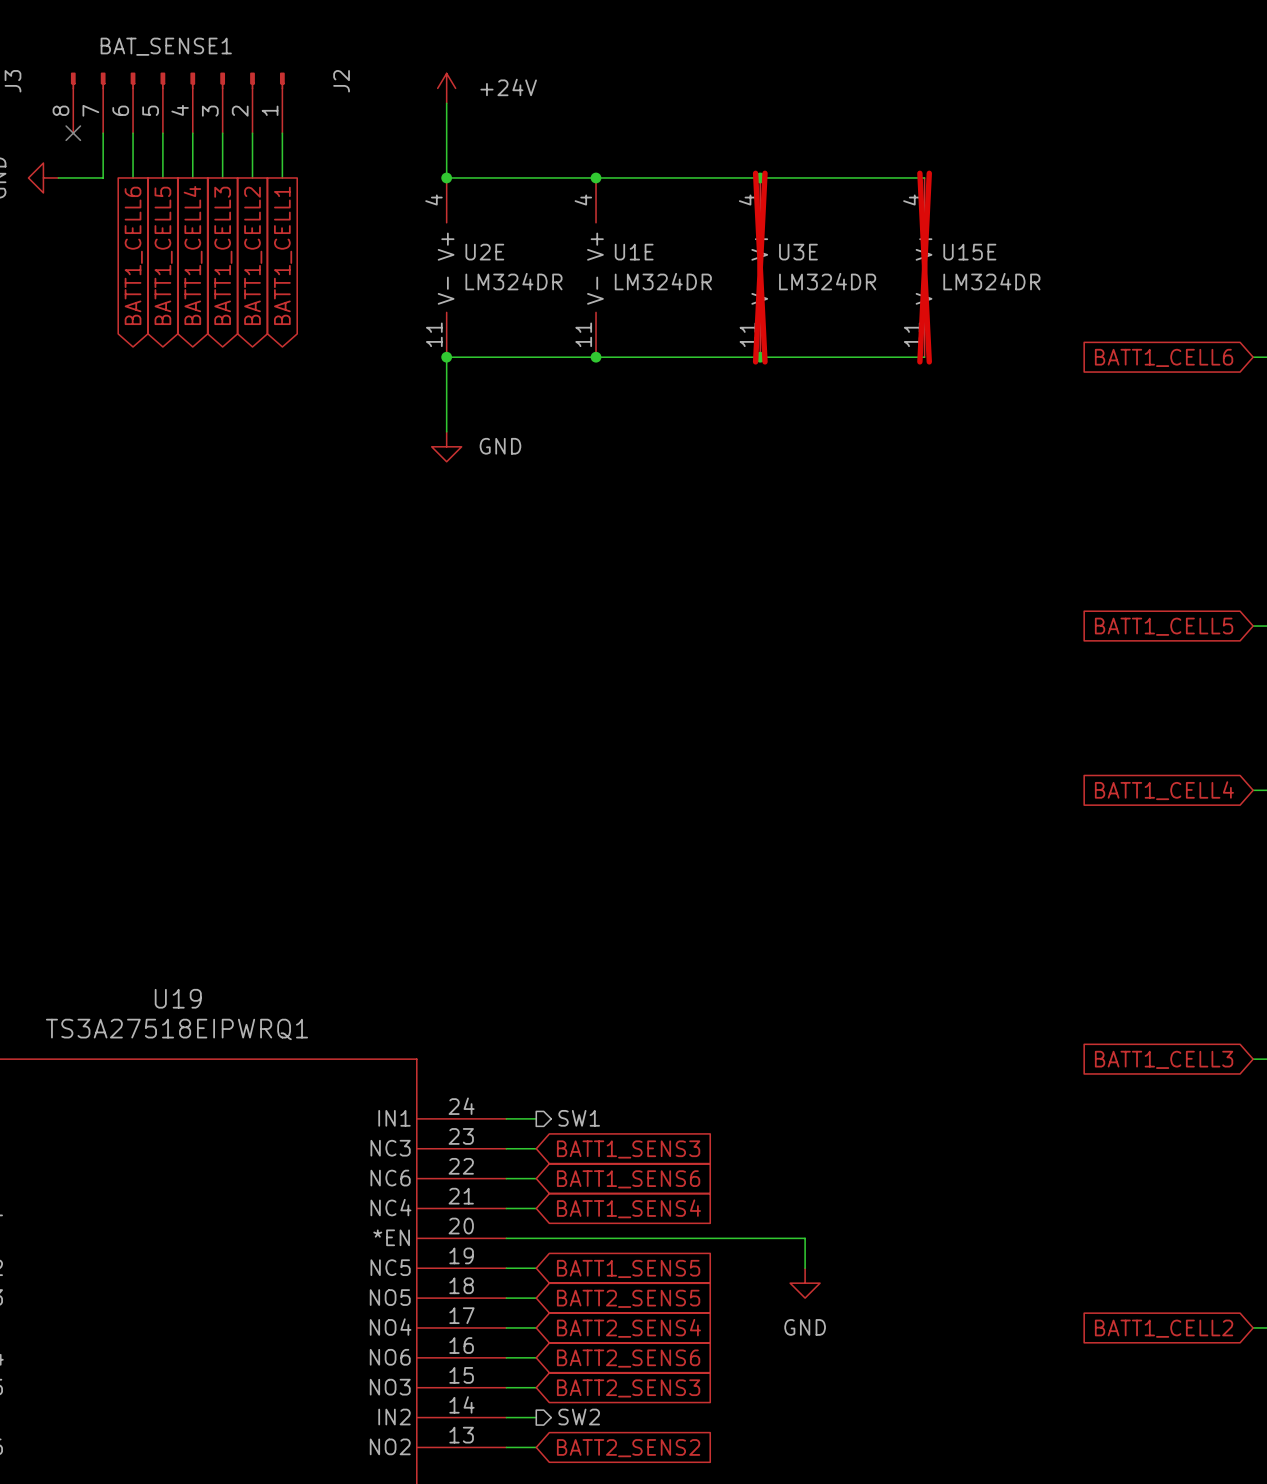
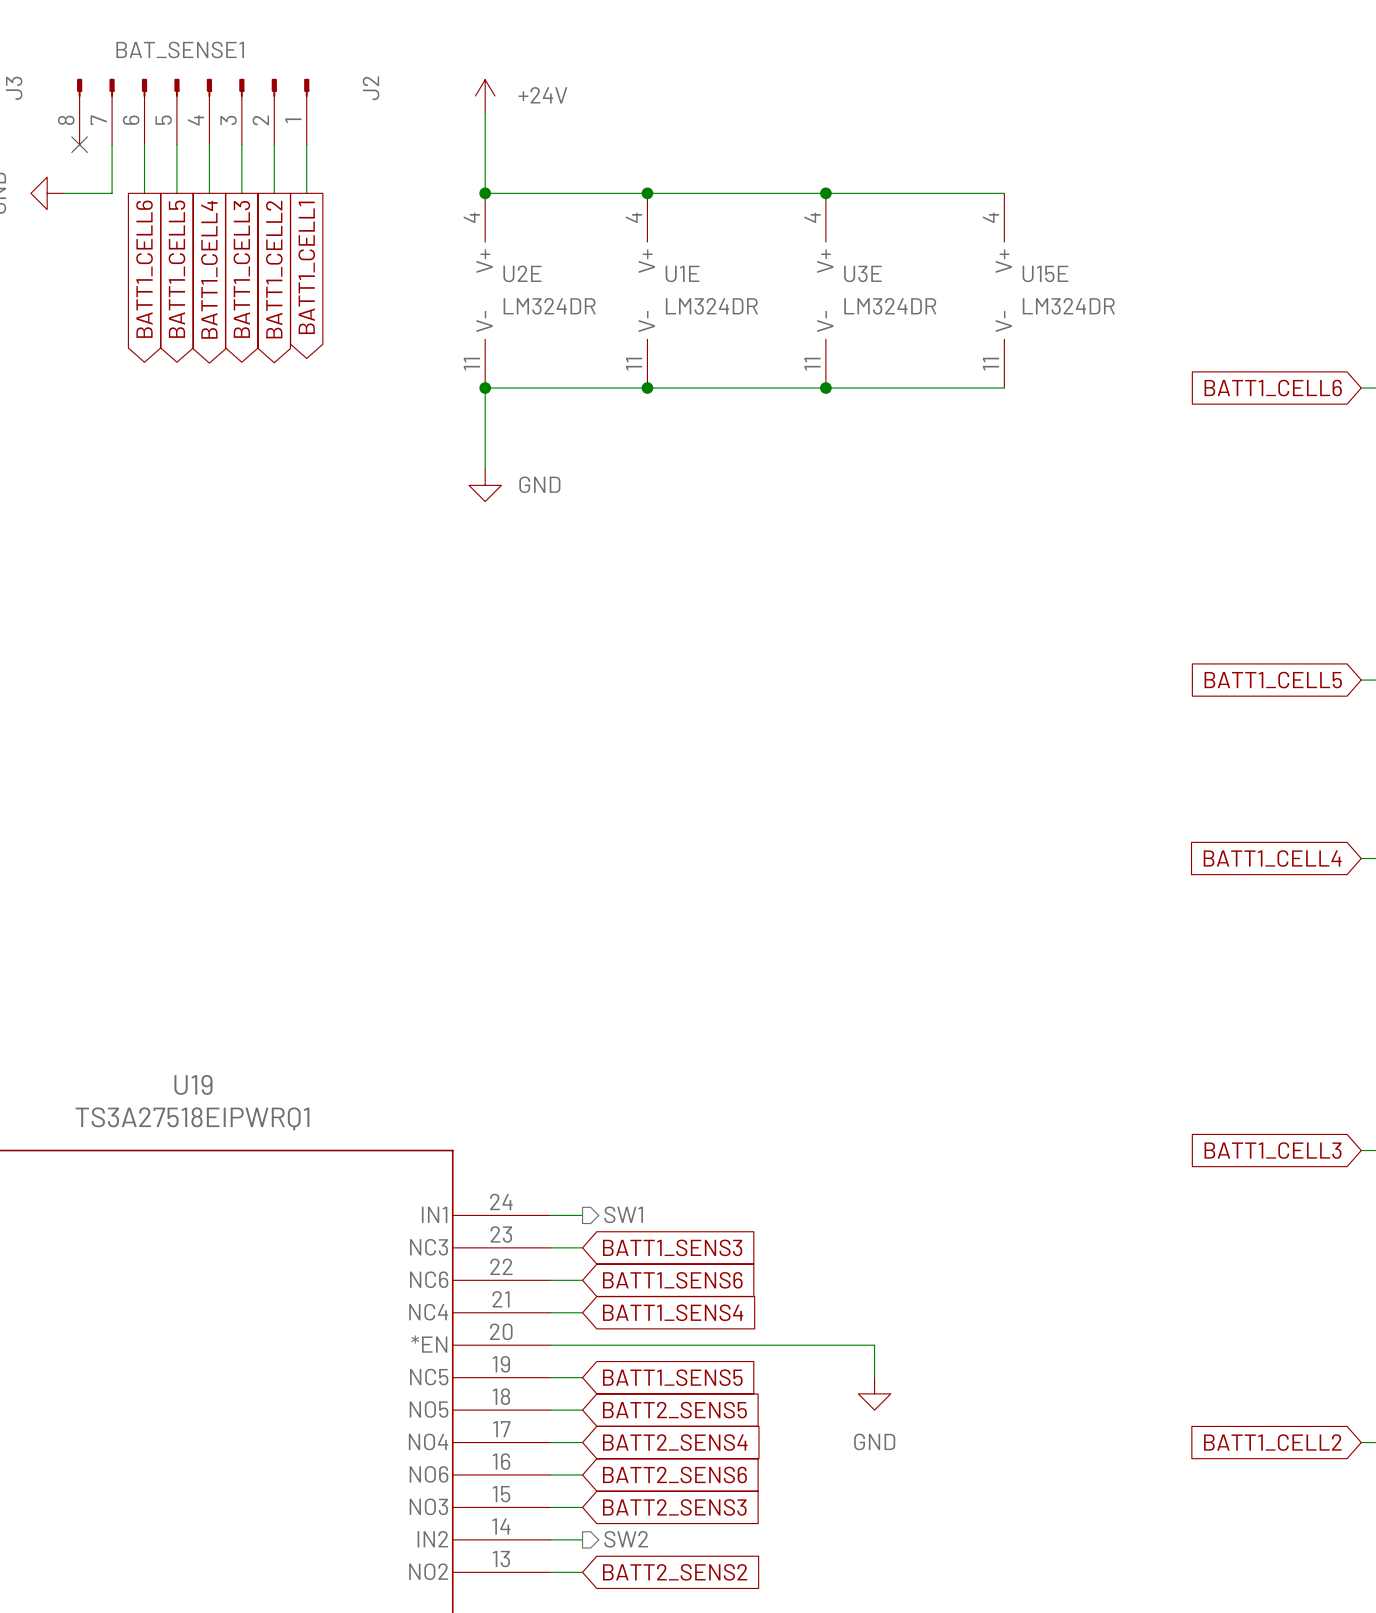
U3E do-not-place cross: (760, 267) -> none
U15E do-not-place cross: (924, 267) -> none

